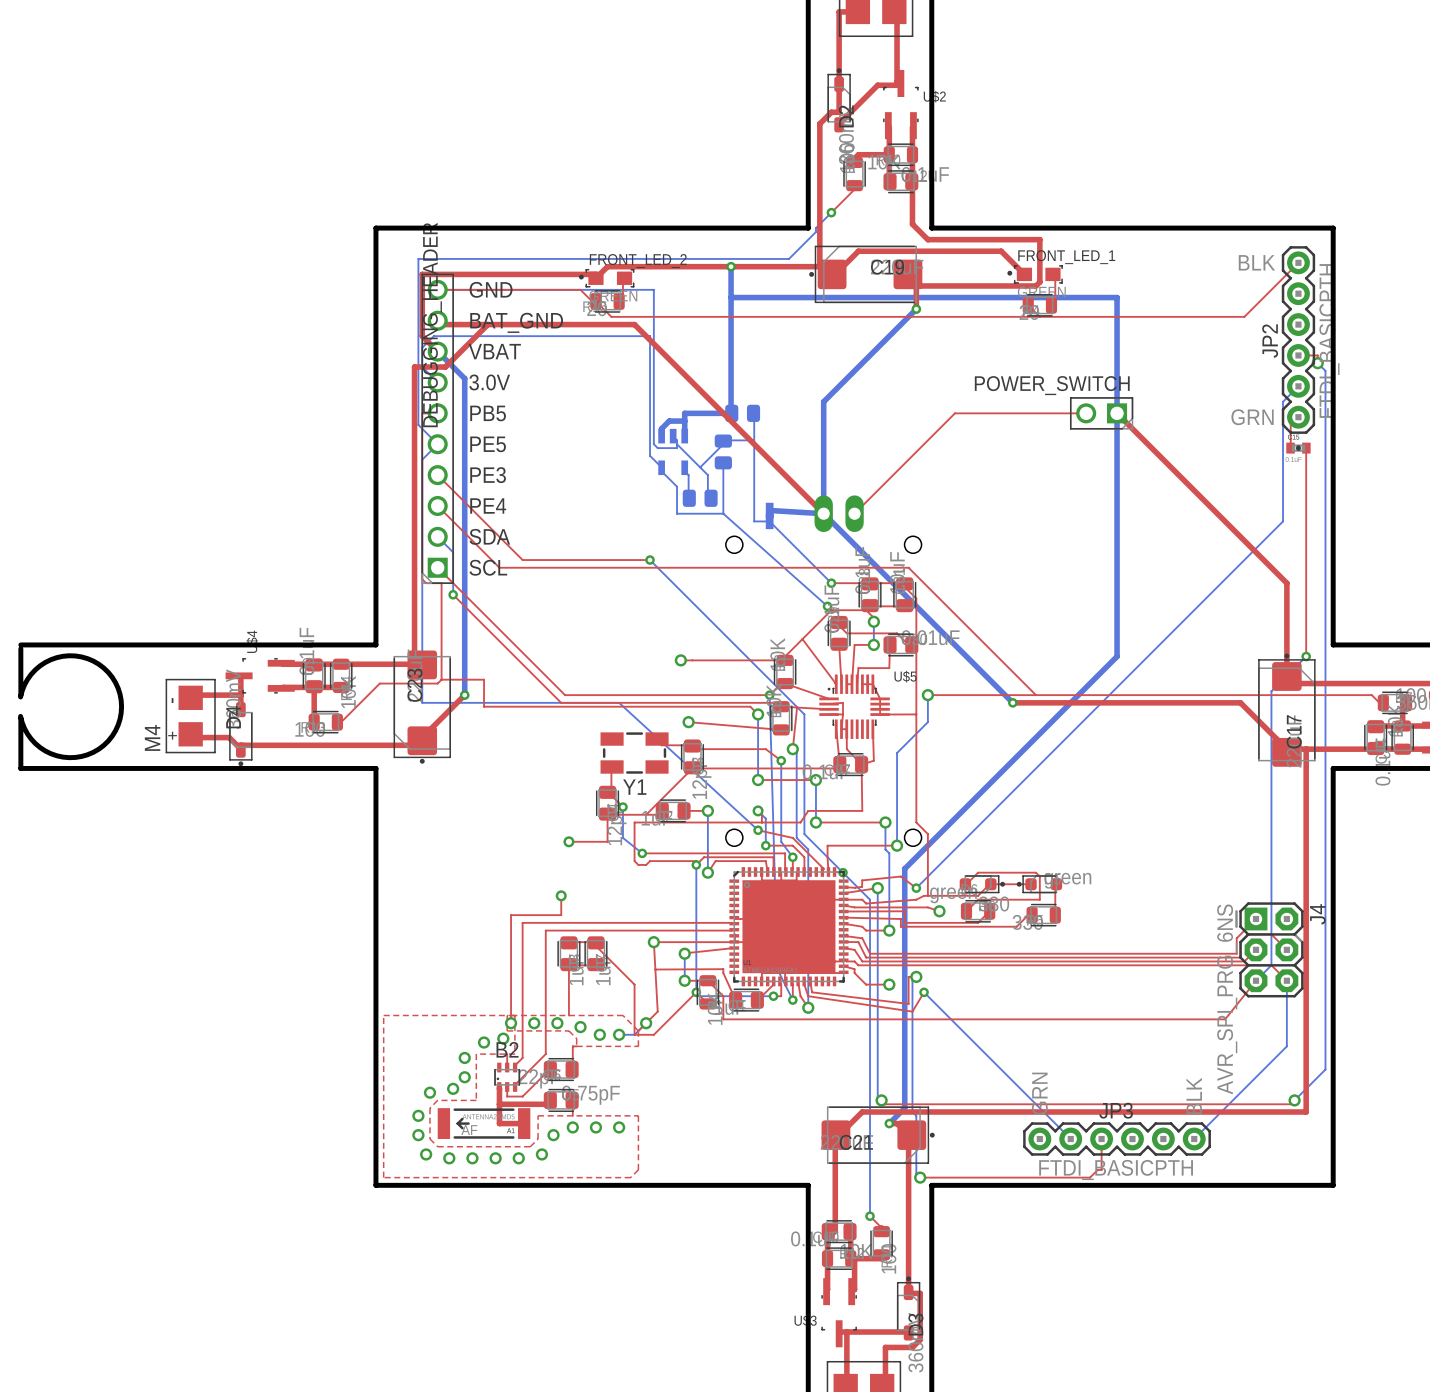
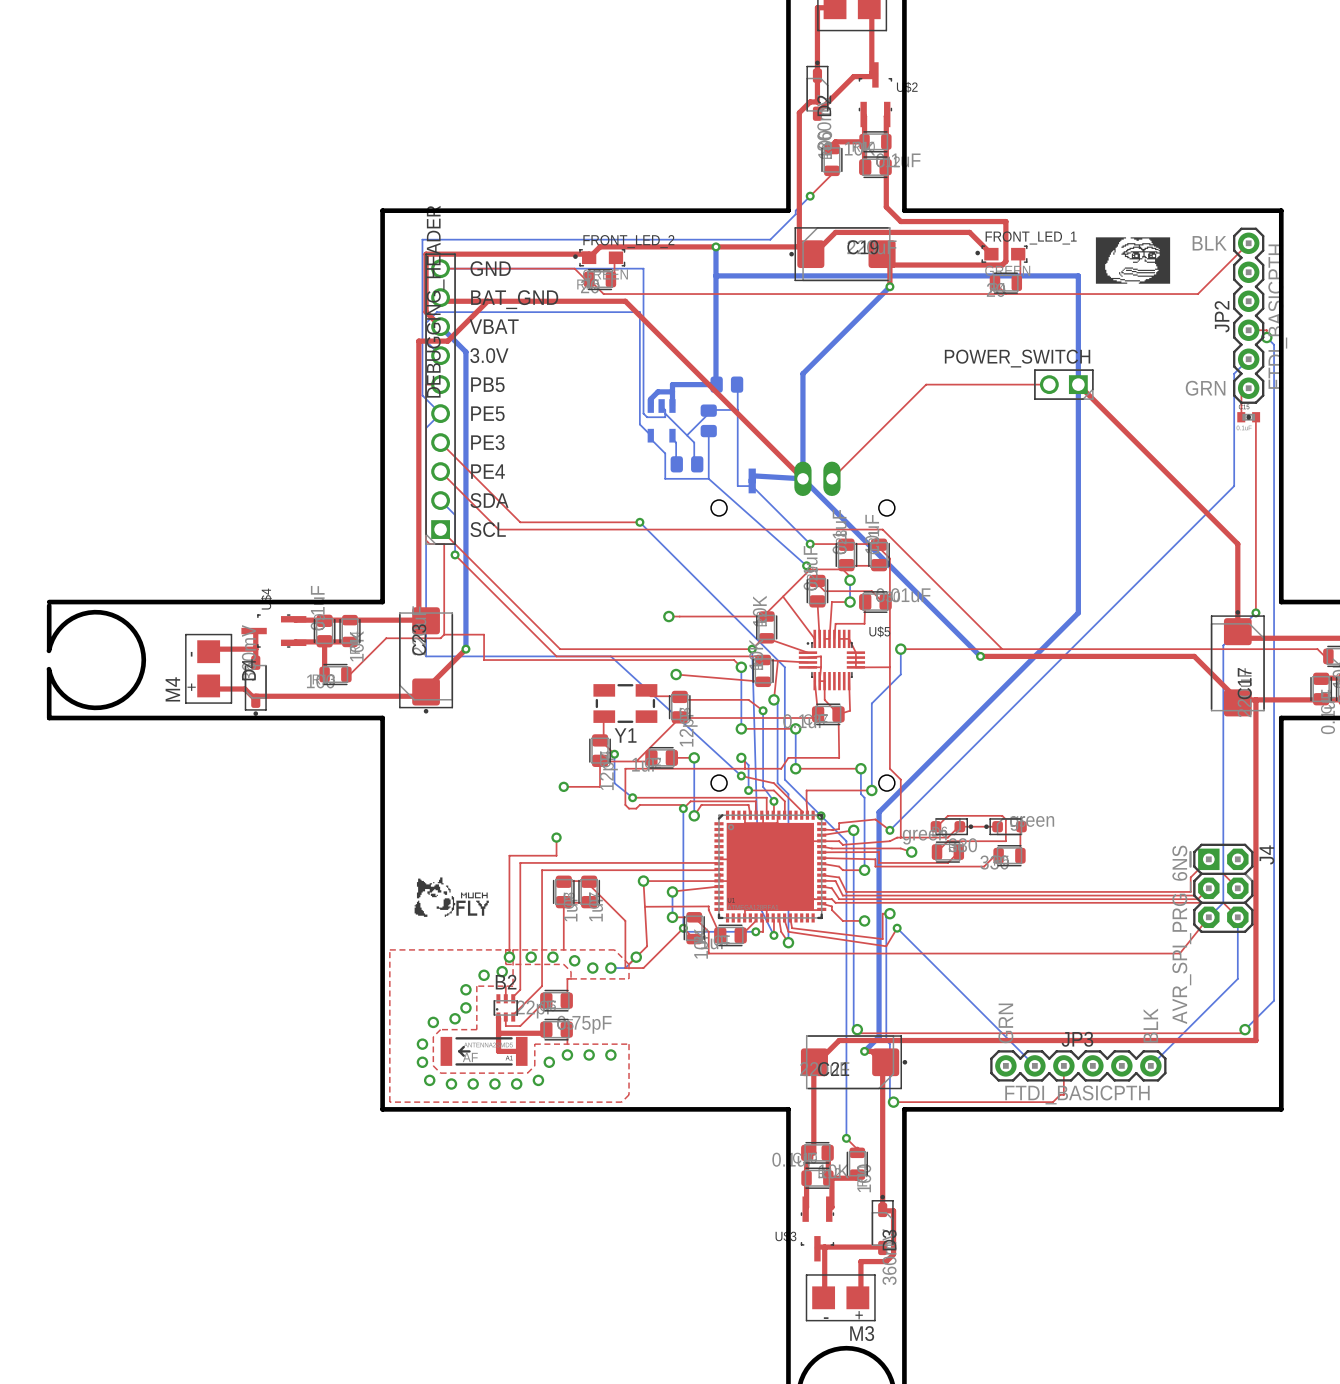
drawing: none -> [1095, 237, 1171, 284]
drawing: none -> [414, 877, 489, 917]

